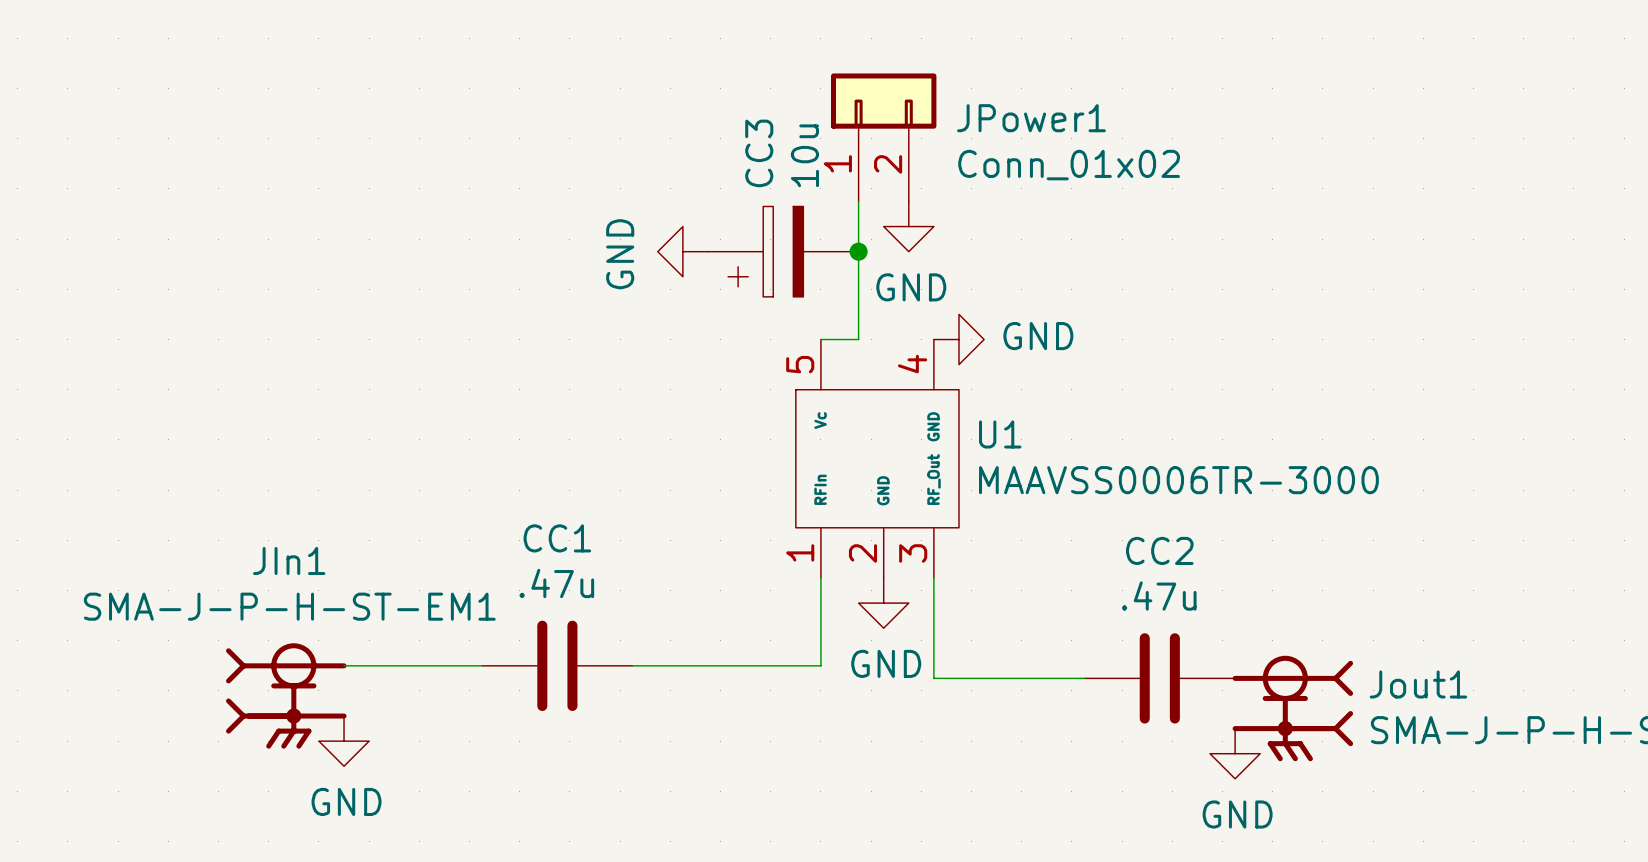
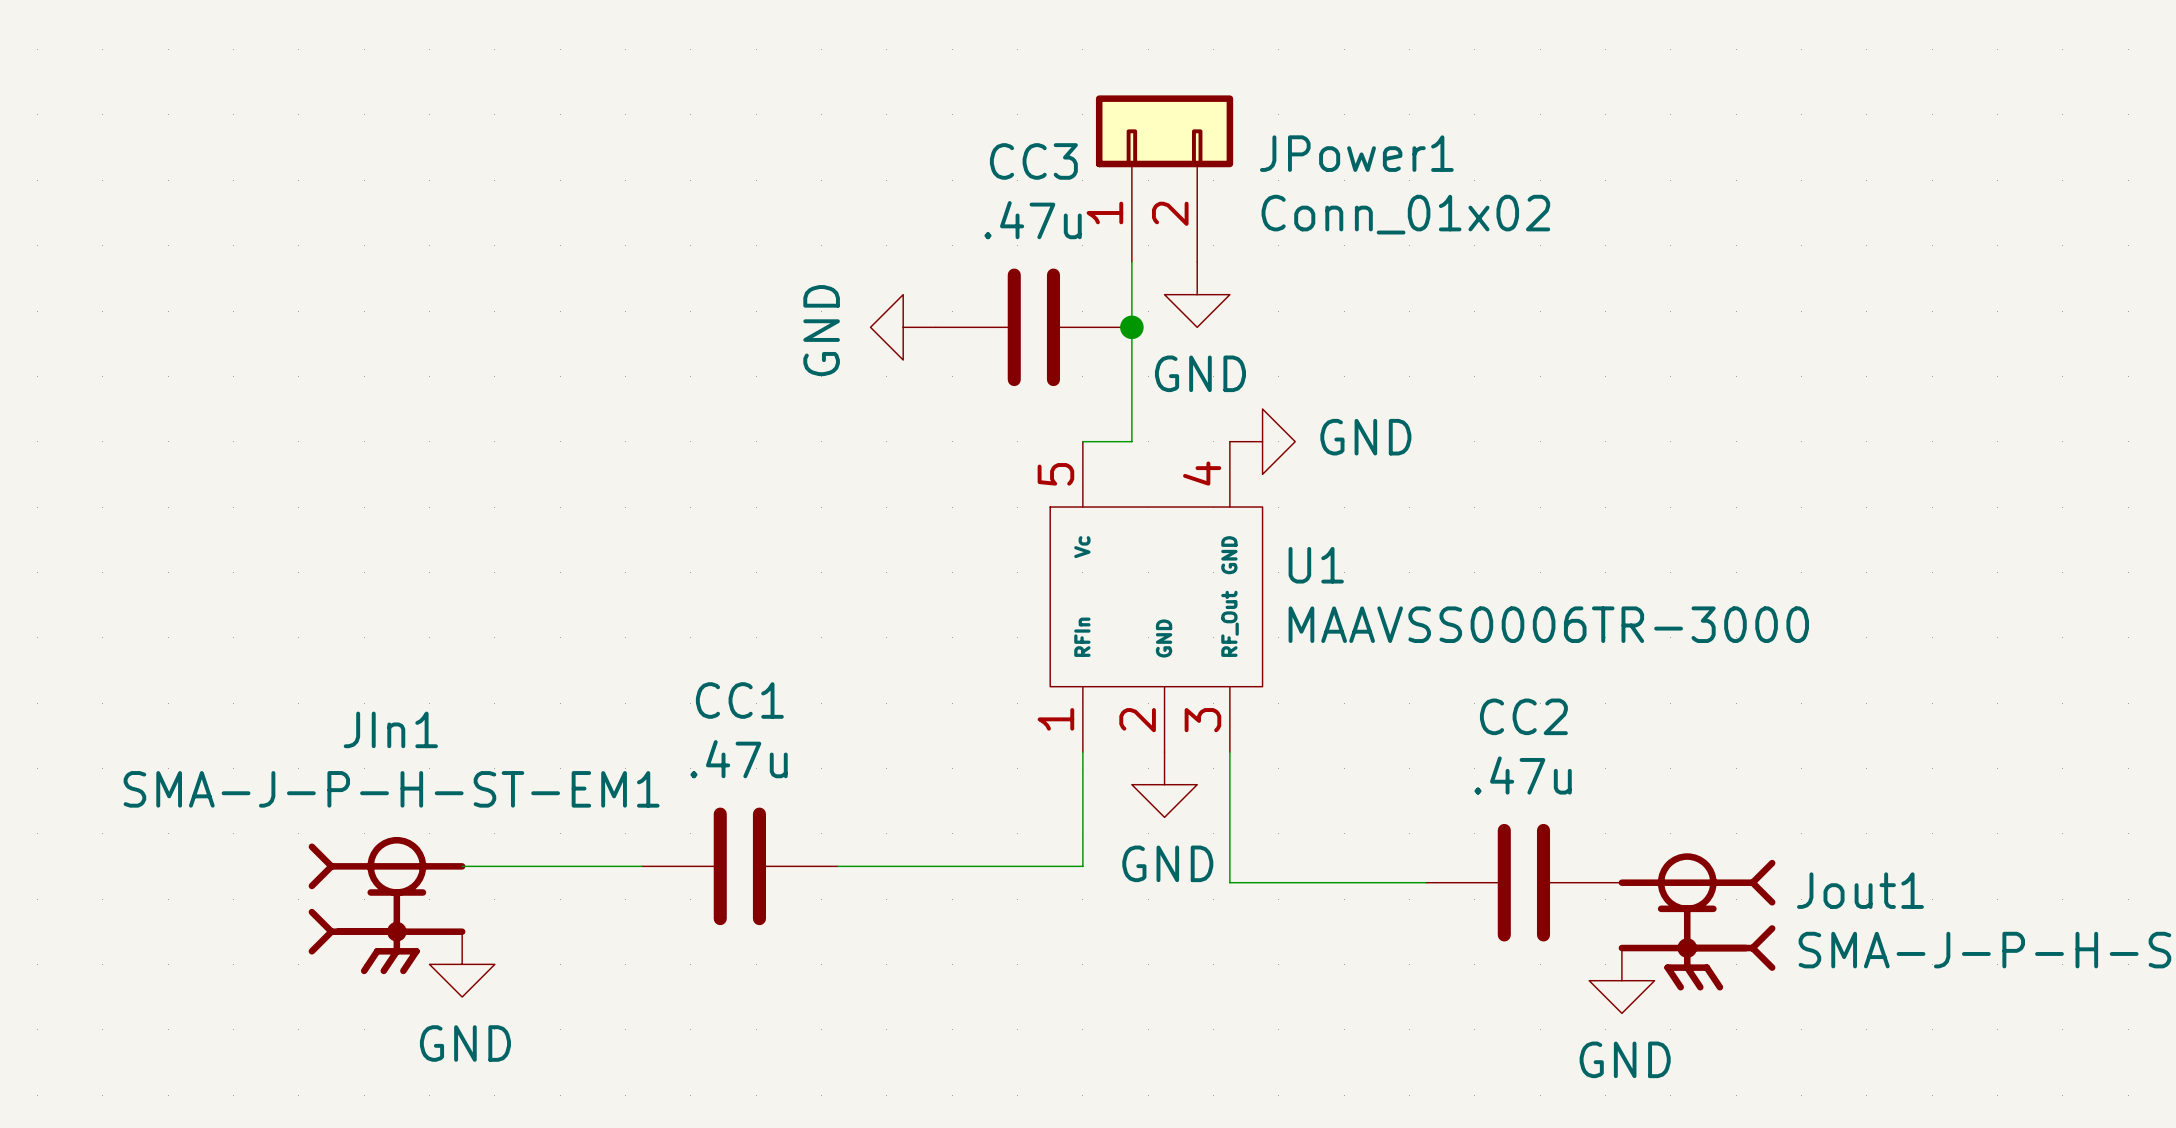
CC3 value: 10u (804, 155) -> .47u (1033, 220)
CC3 symbol: [707, 206, 859, 297] -> [935, 268, 1132, 387]

